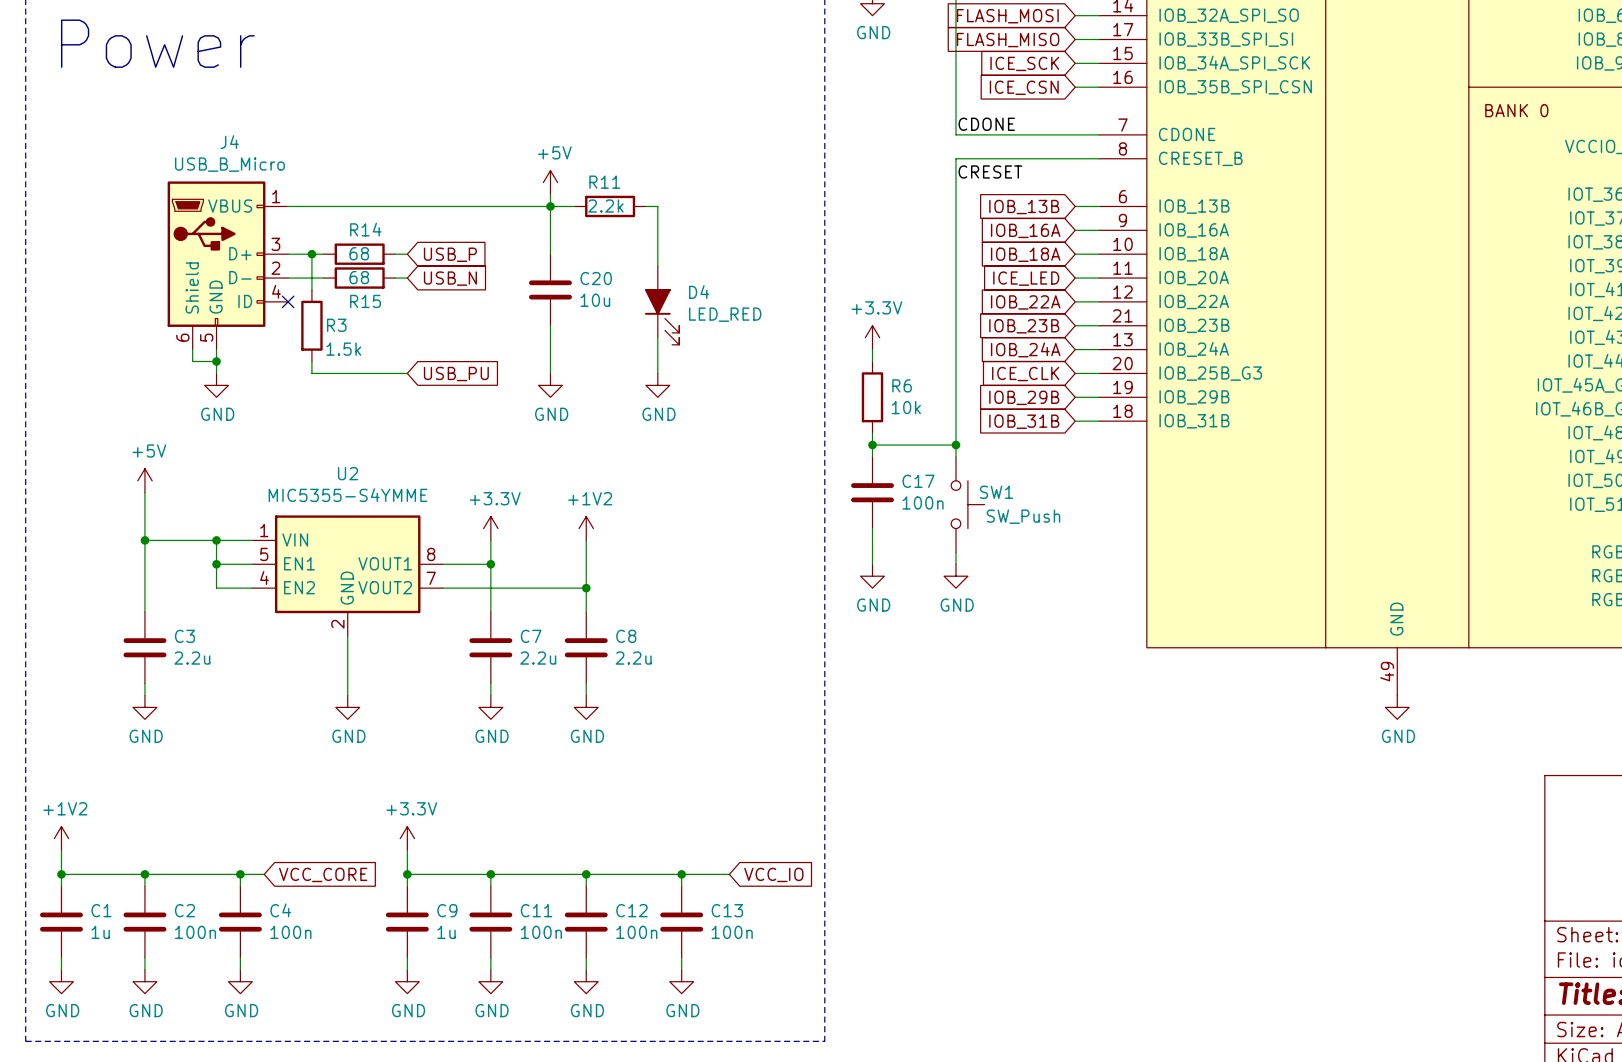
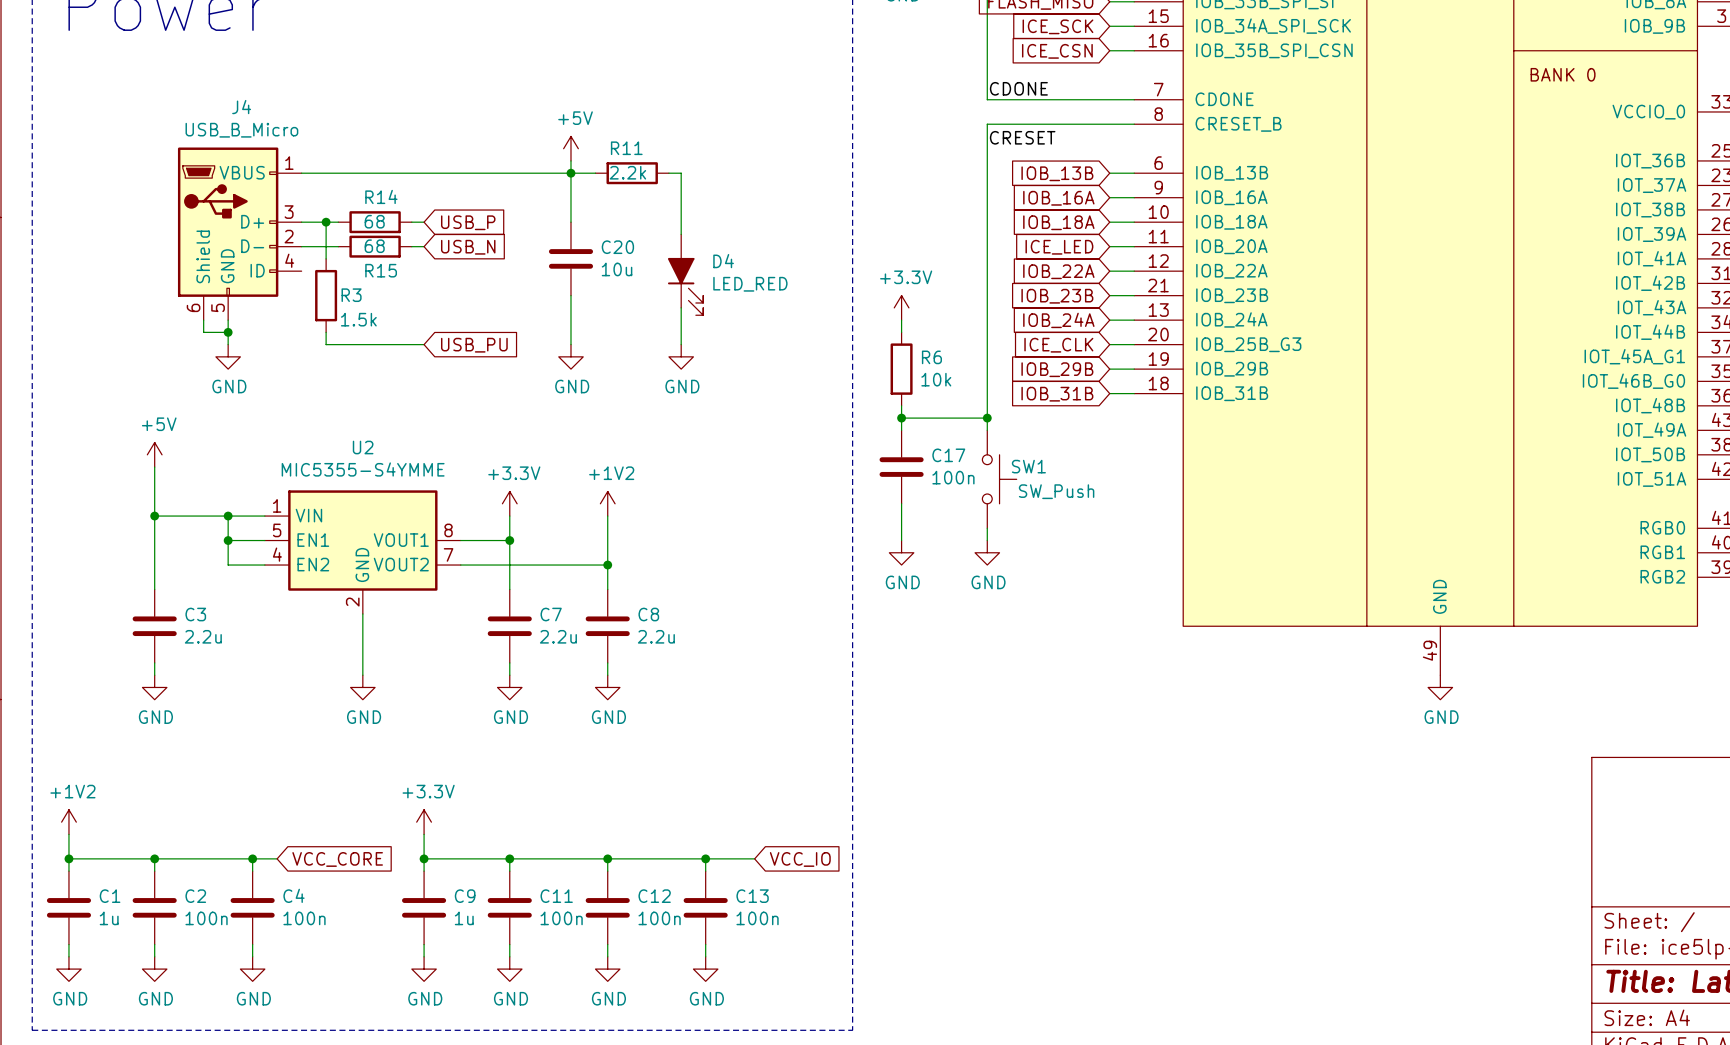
no-connect mark: (288, 301) -> none

